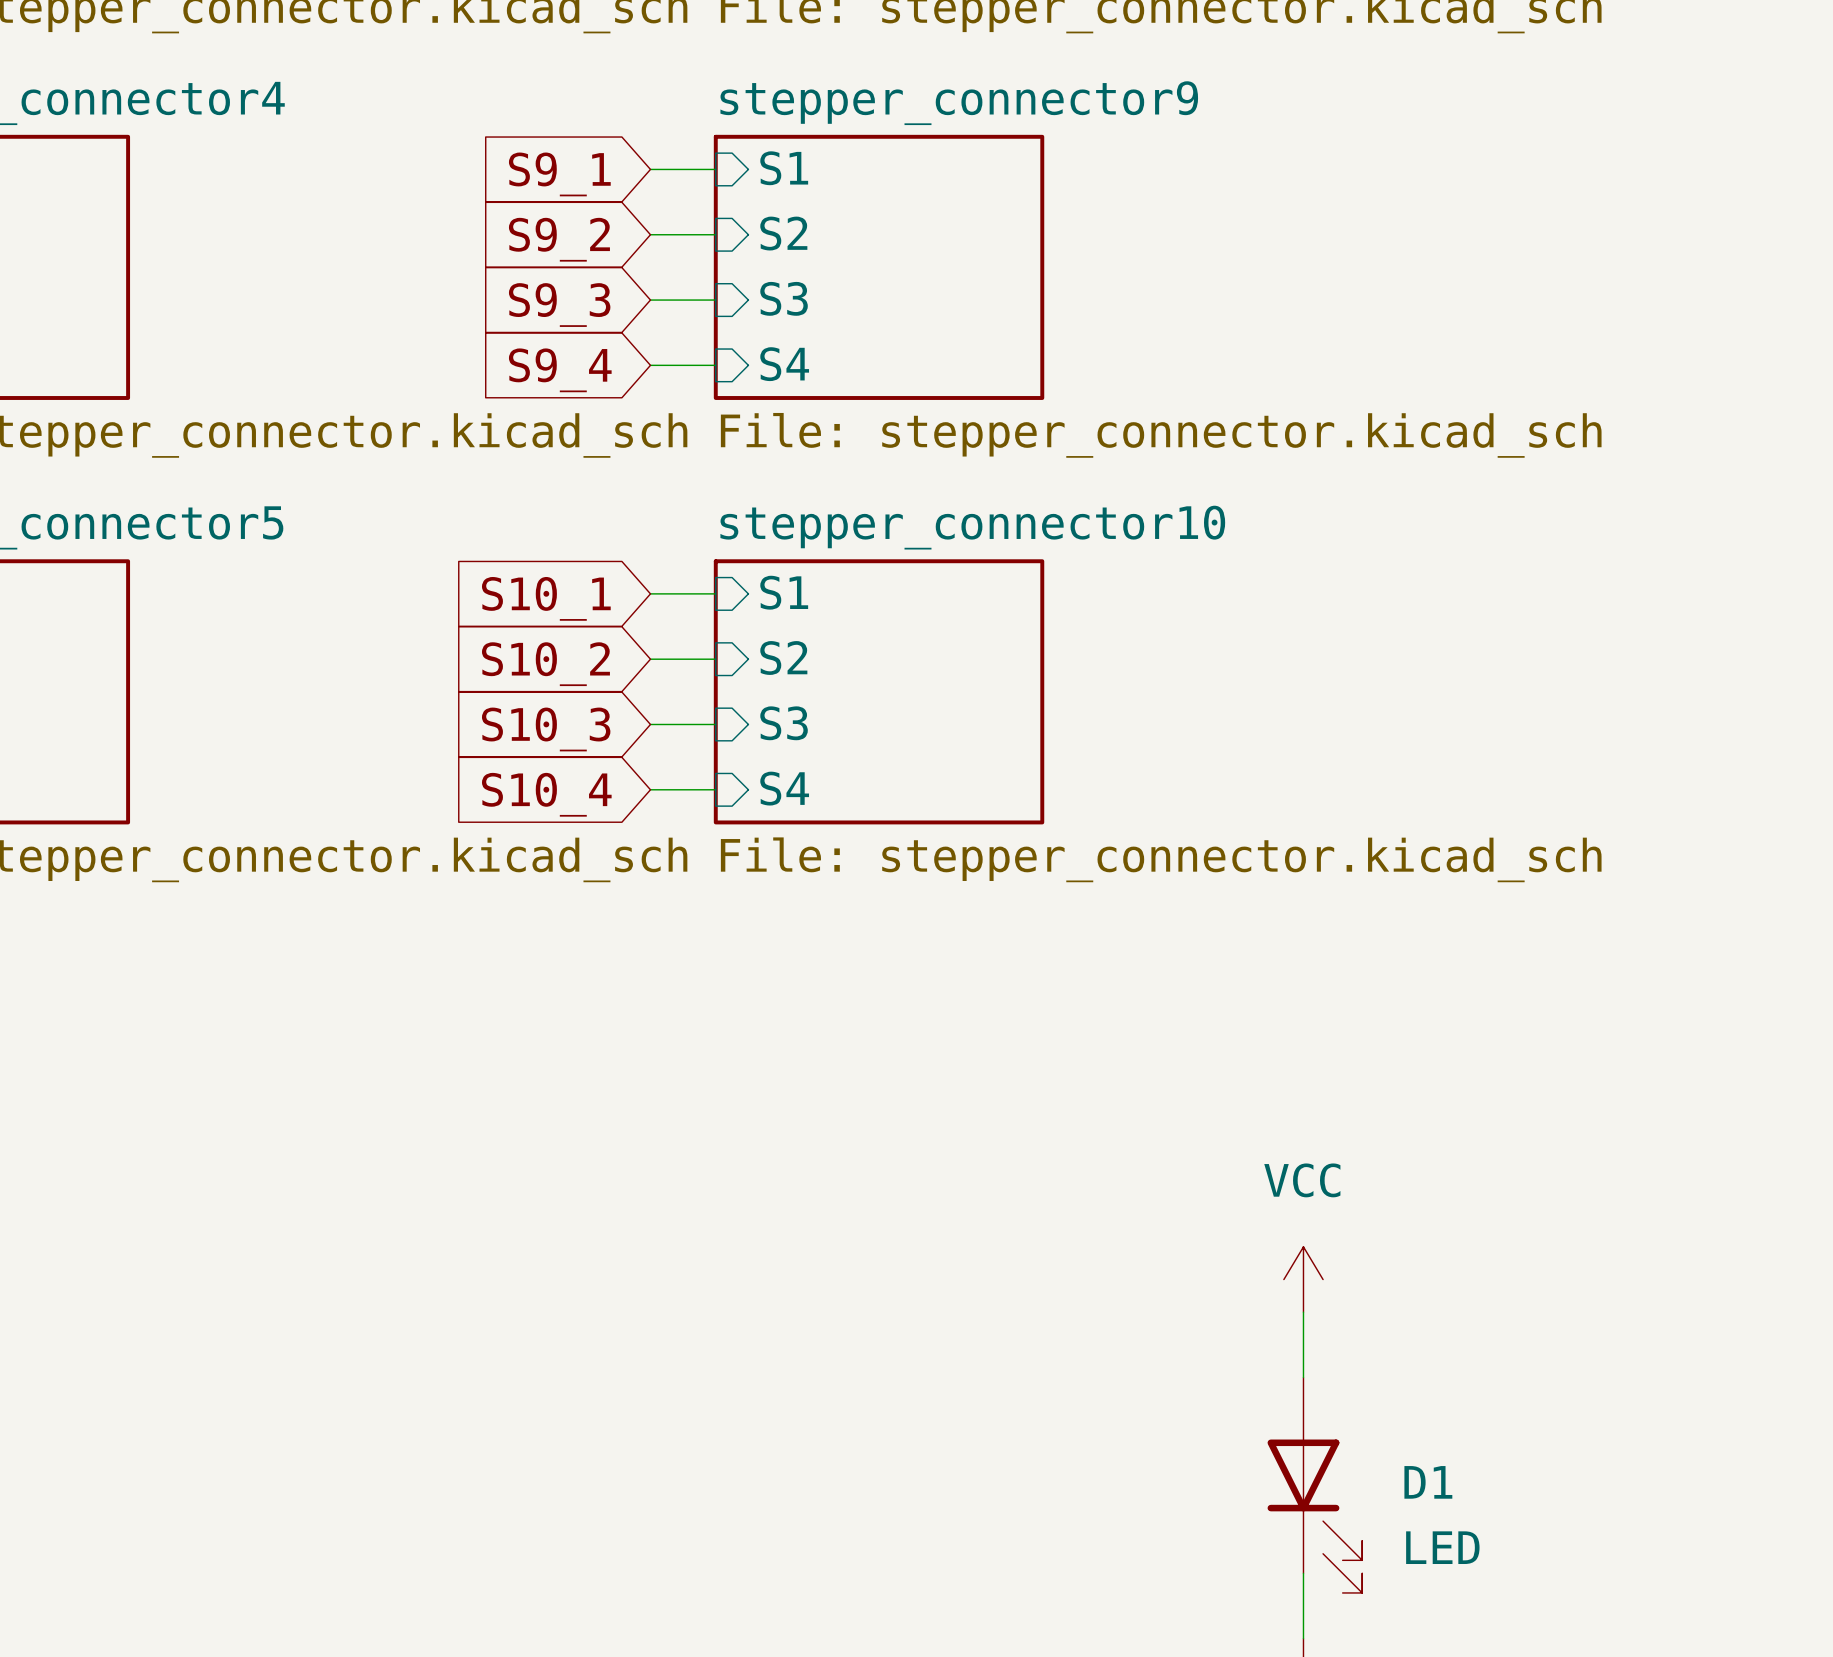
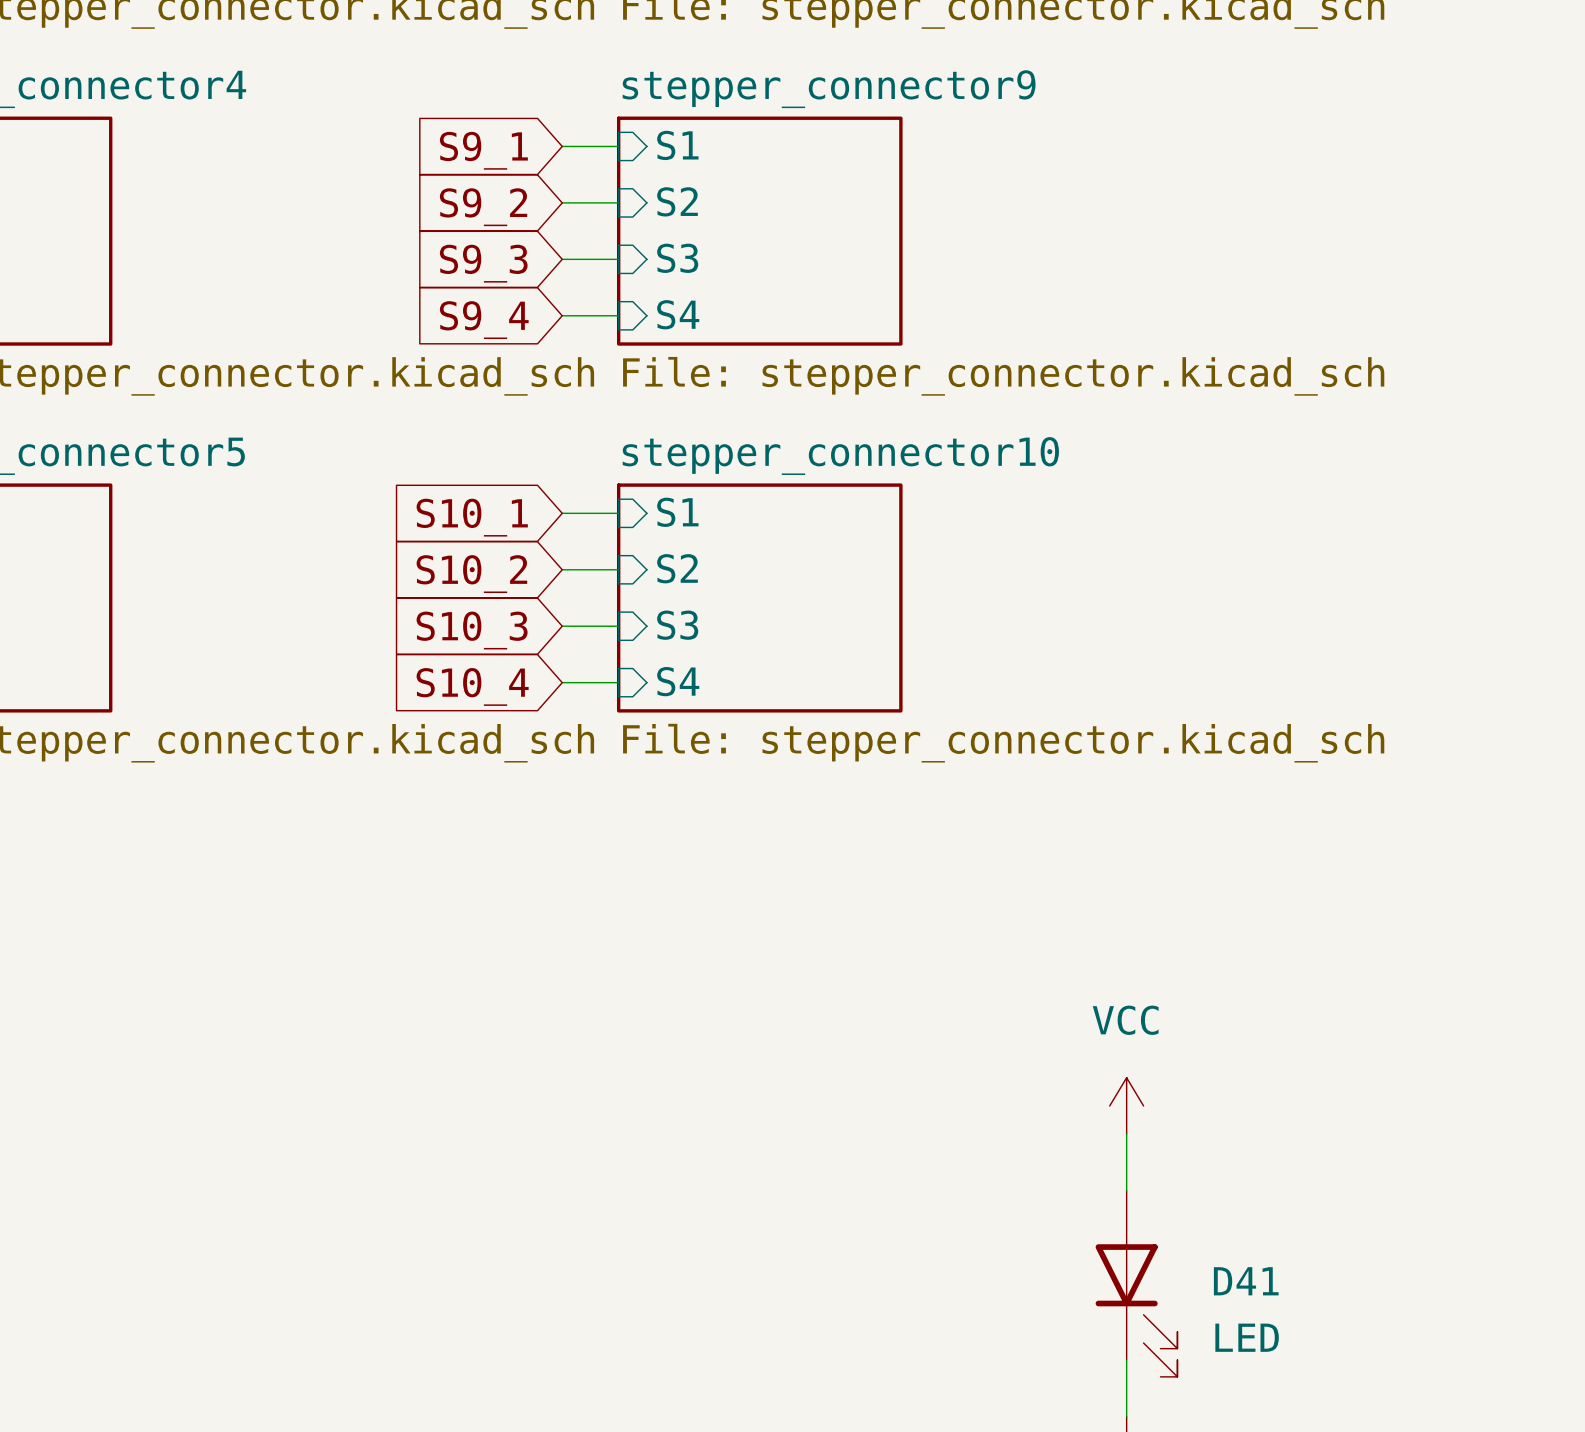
D1 name: D1 (1428, 1482) -> D41 (1246, 1281)

